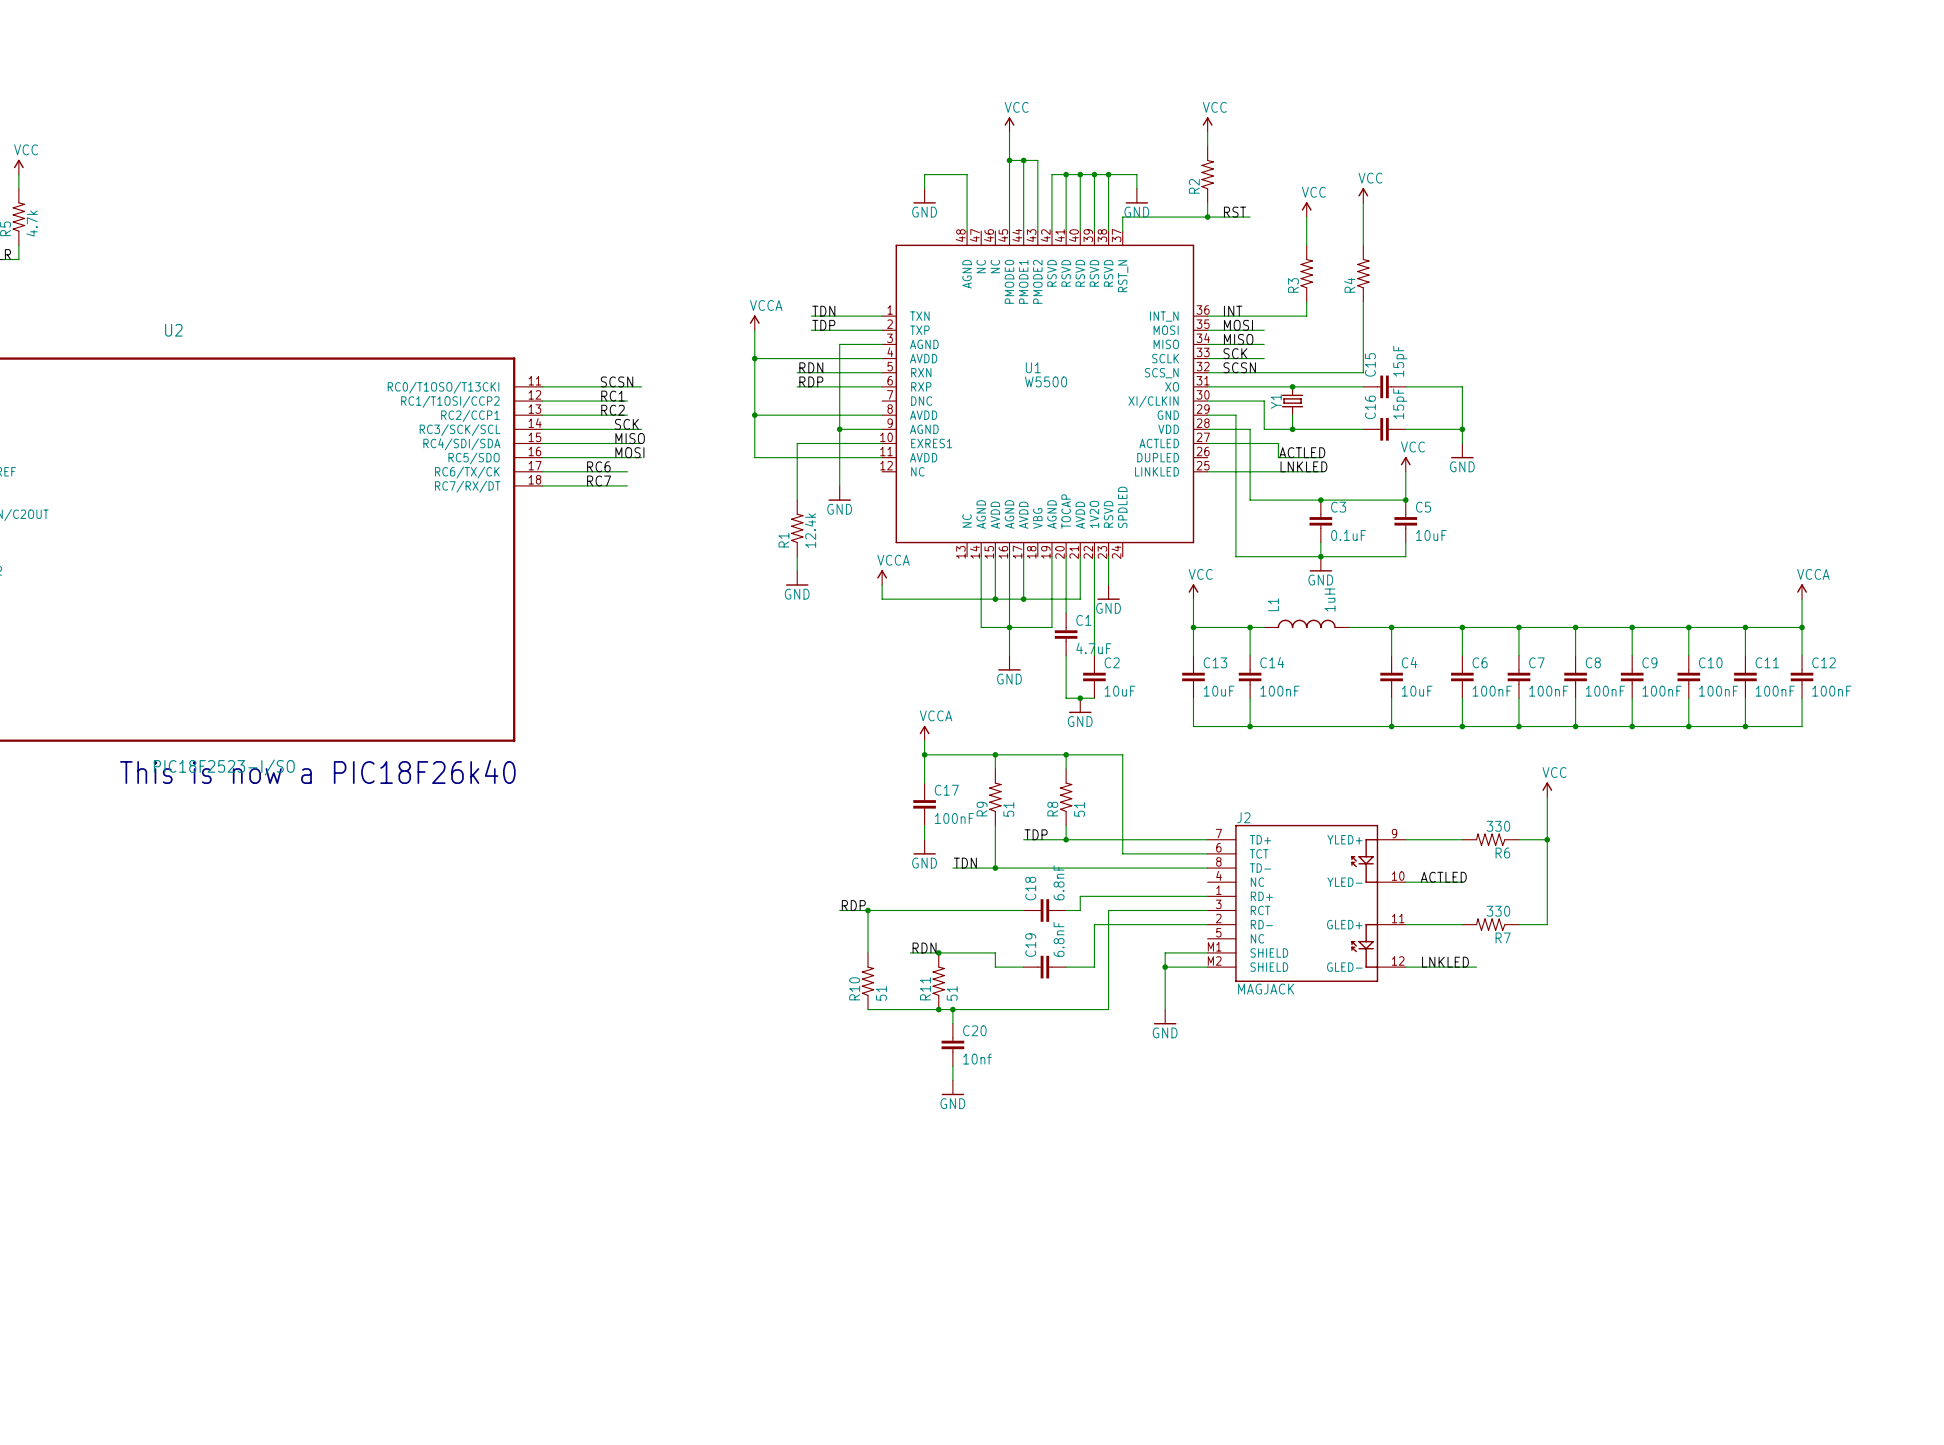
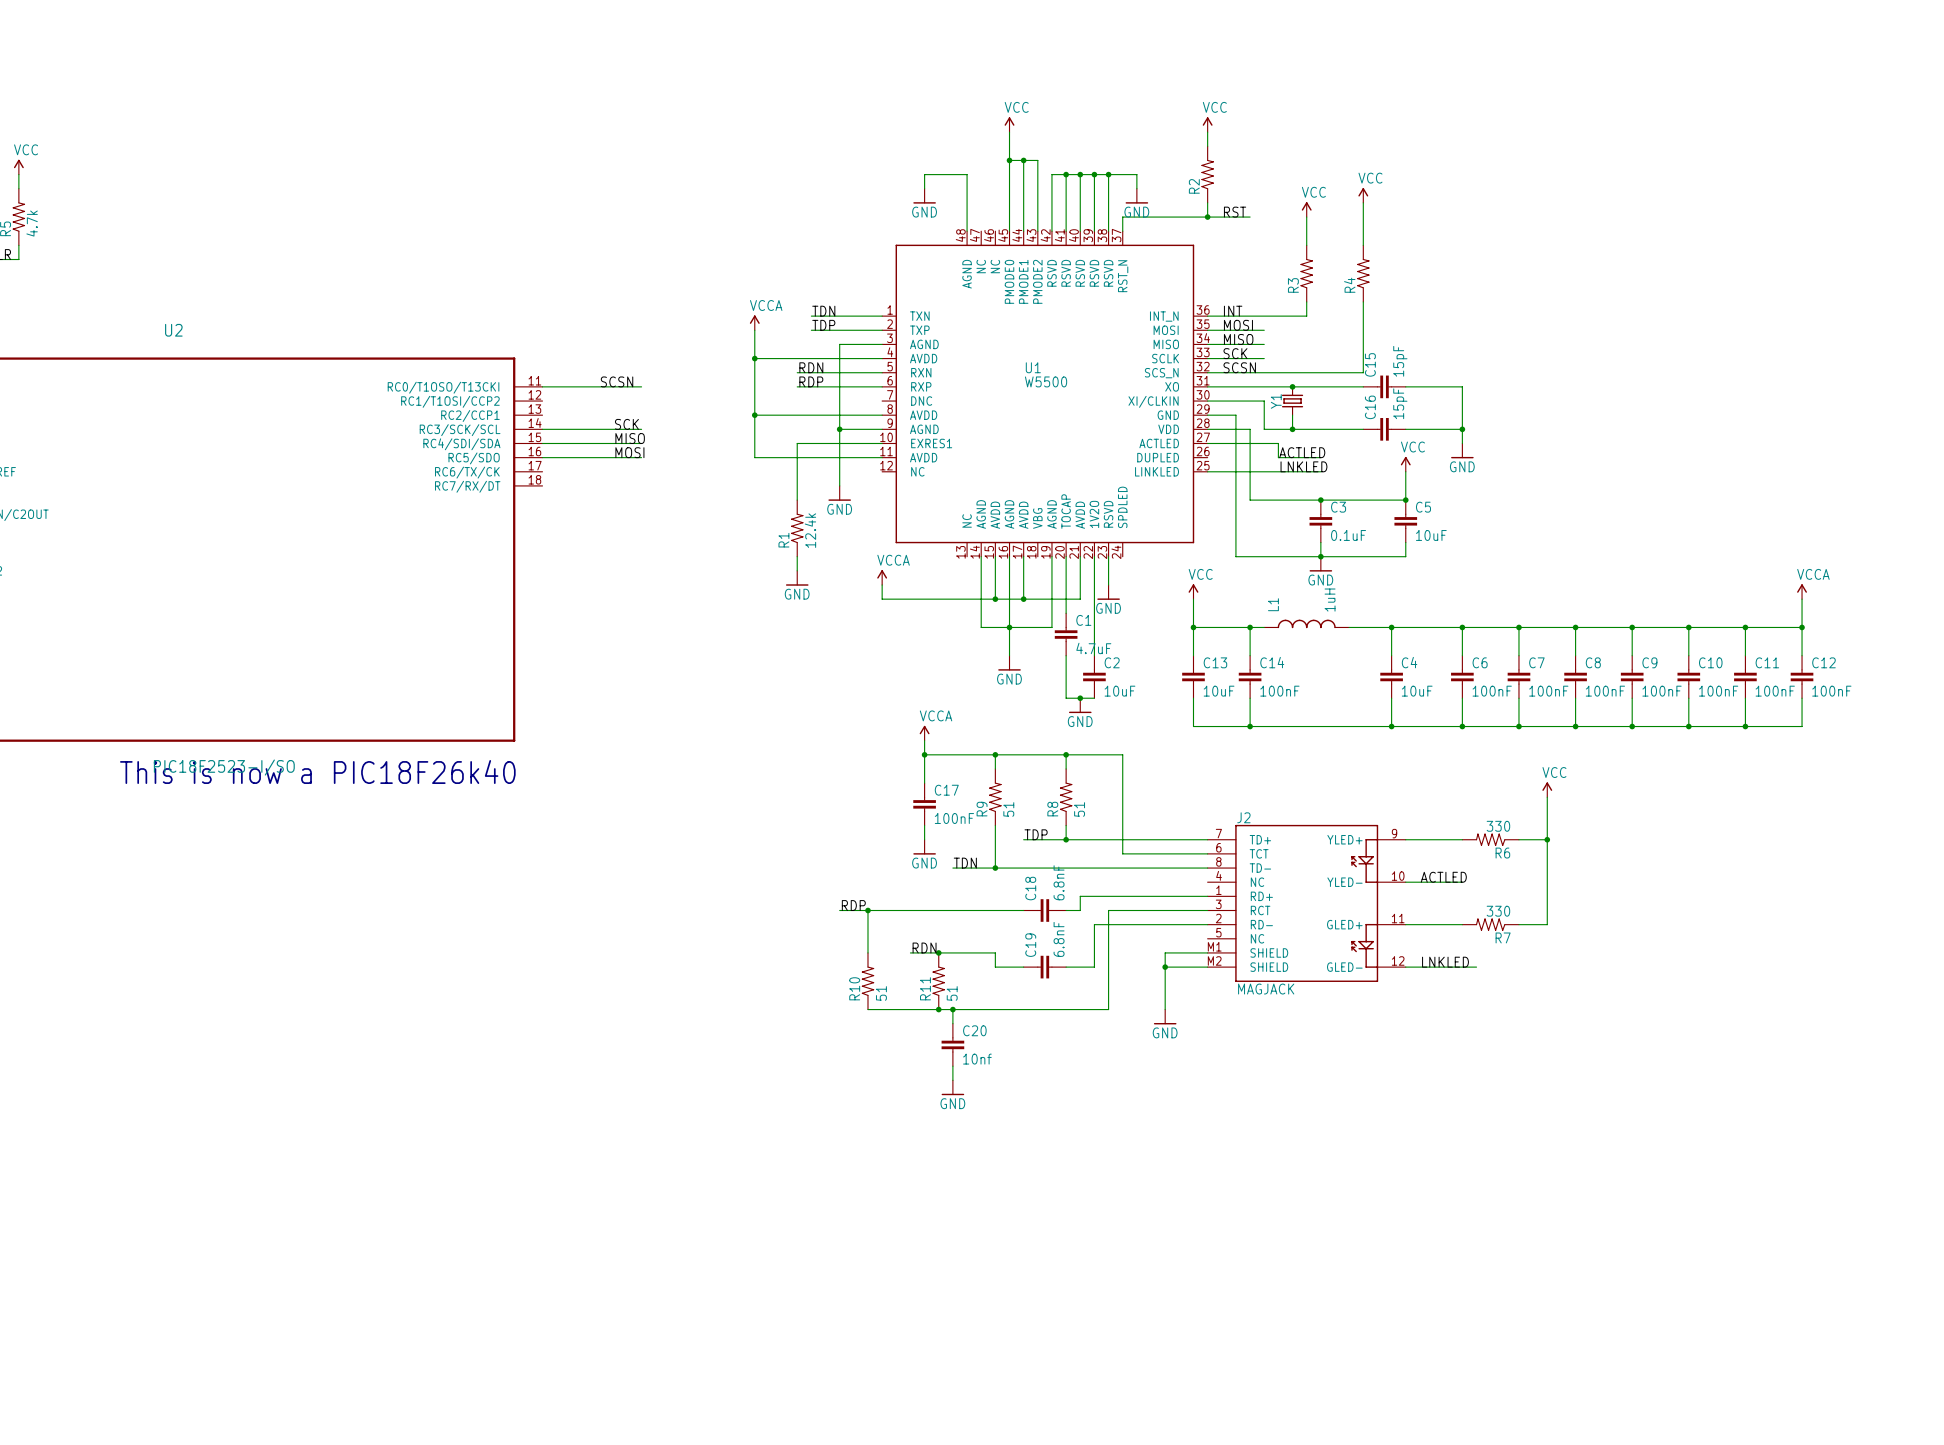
label: RC1 (613, 396) -> none
wire: (542, 401) (627, 401) -> none
label: RC2 (613, 410) -> none
wire: (542, 415) (627, 415) -> none
label: RC6 (598, 466) -> none
wire: (542, 471) (627, 471) -> none
label: RC7 (599, 480) -> none
wire: (542, 485) (627, 485) -> none

